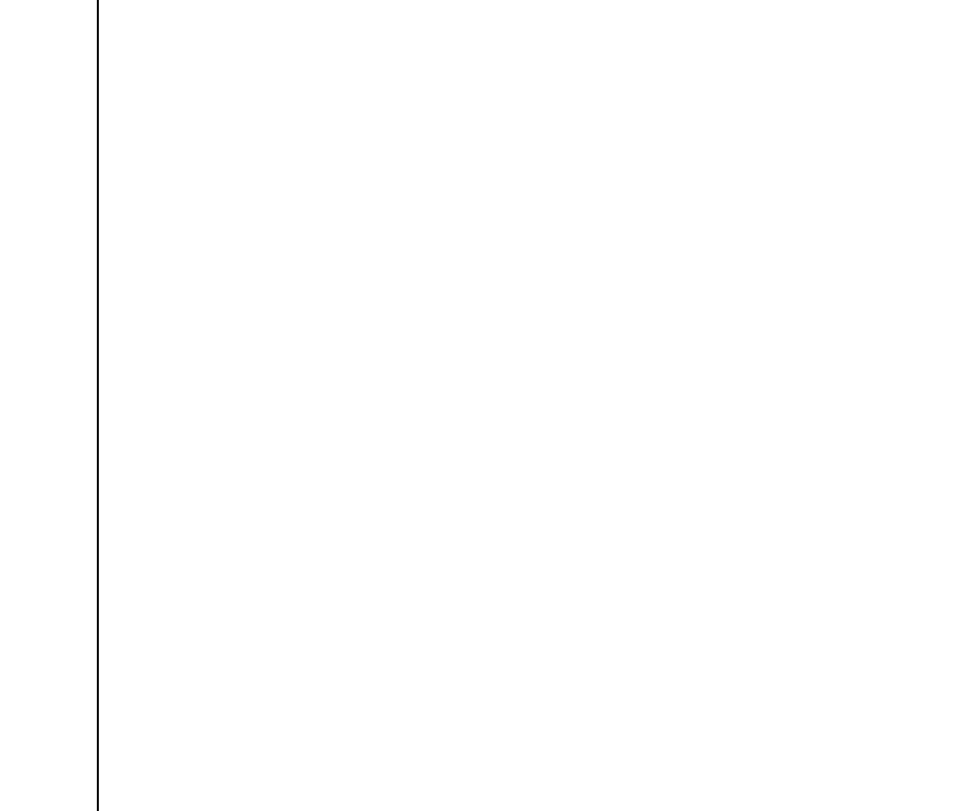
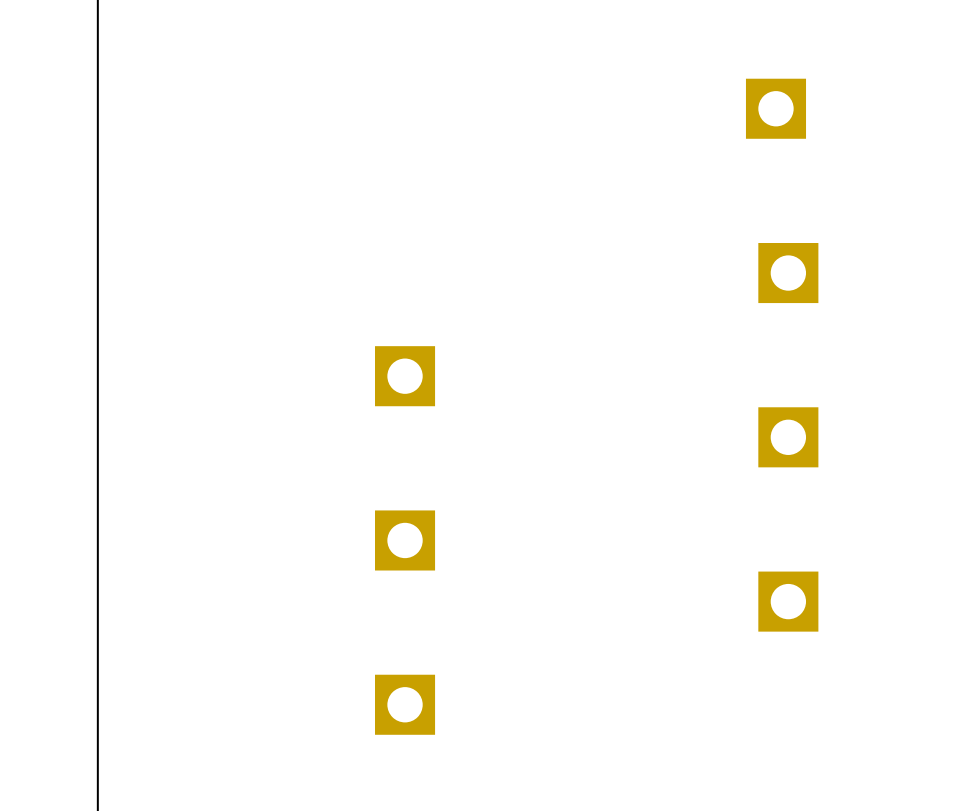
part: none -> (775, 108)
part: none -> (788, 273)
part: none -> (405, 376)
part: none -> (788, 437)
part: none -> (405, 540)
part: none -> (788, 601)
part: none -> (405, 704)

